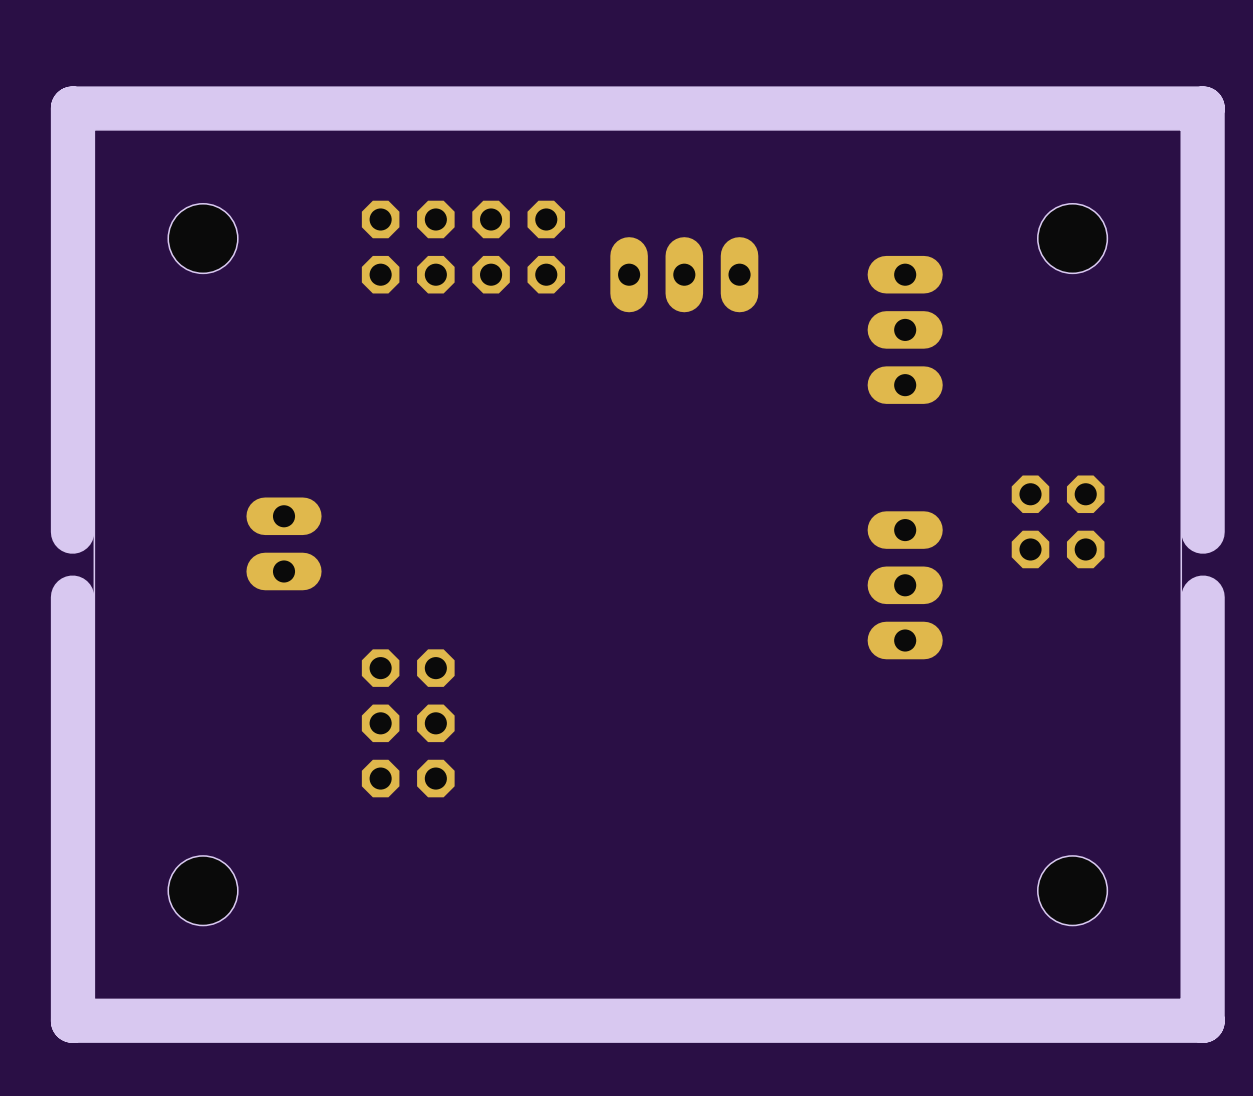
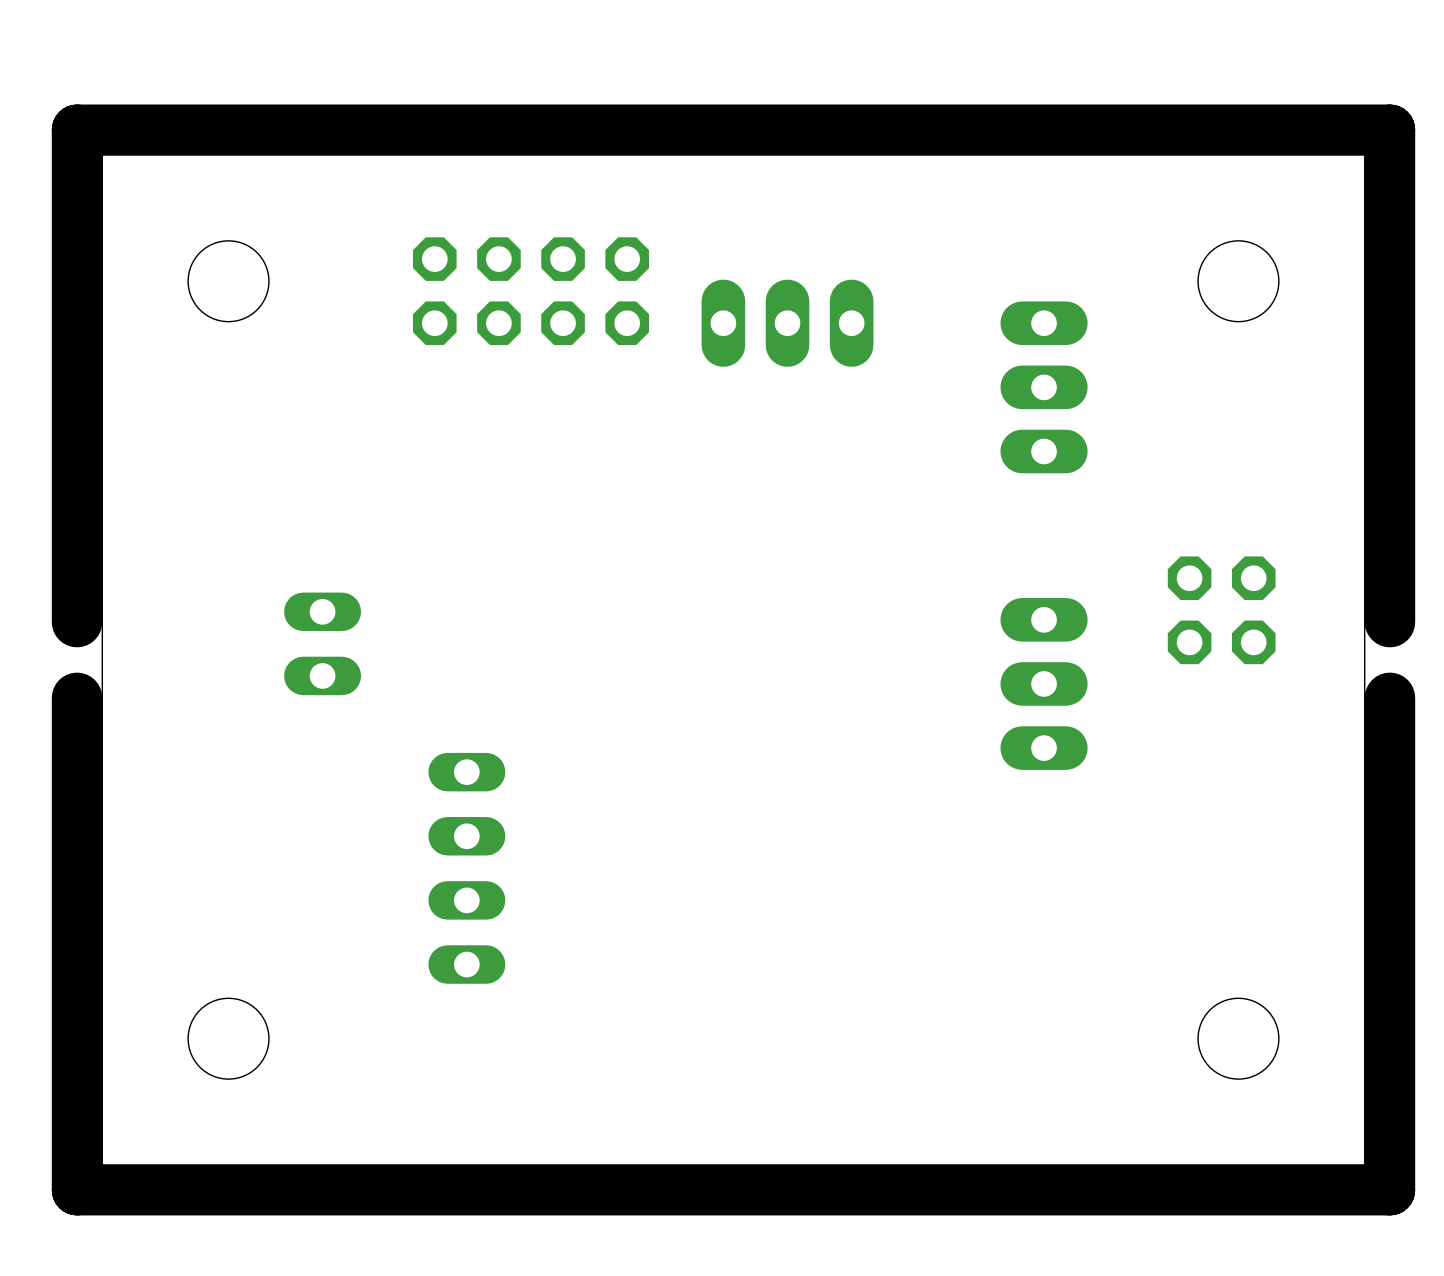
part footprint: [246, 497, 322, 591] -> [284, 592, 362, 696]
part footprint: [361, 649, 455, 798] -> [428, 752, 506, 984]

